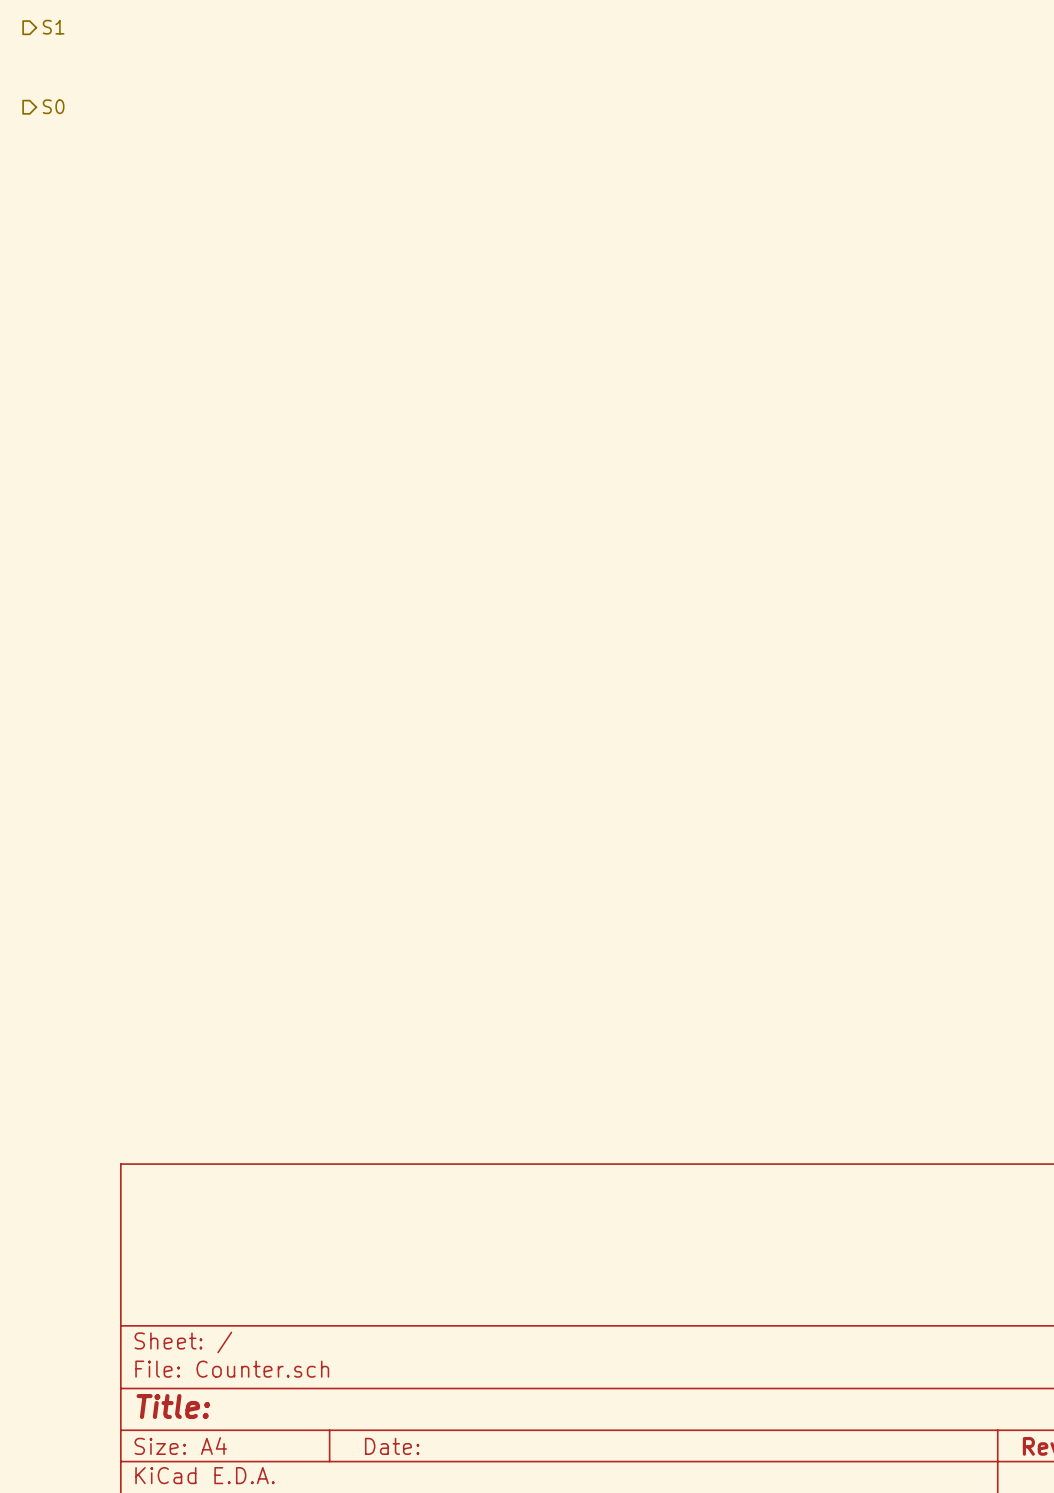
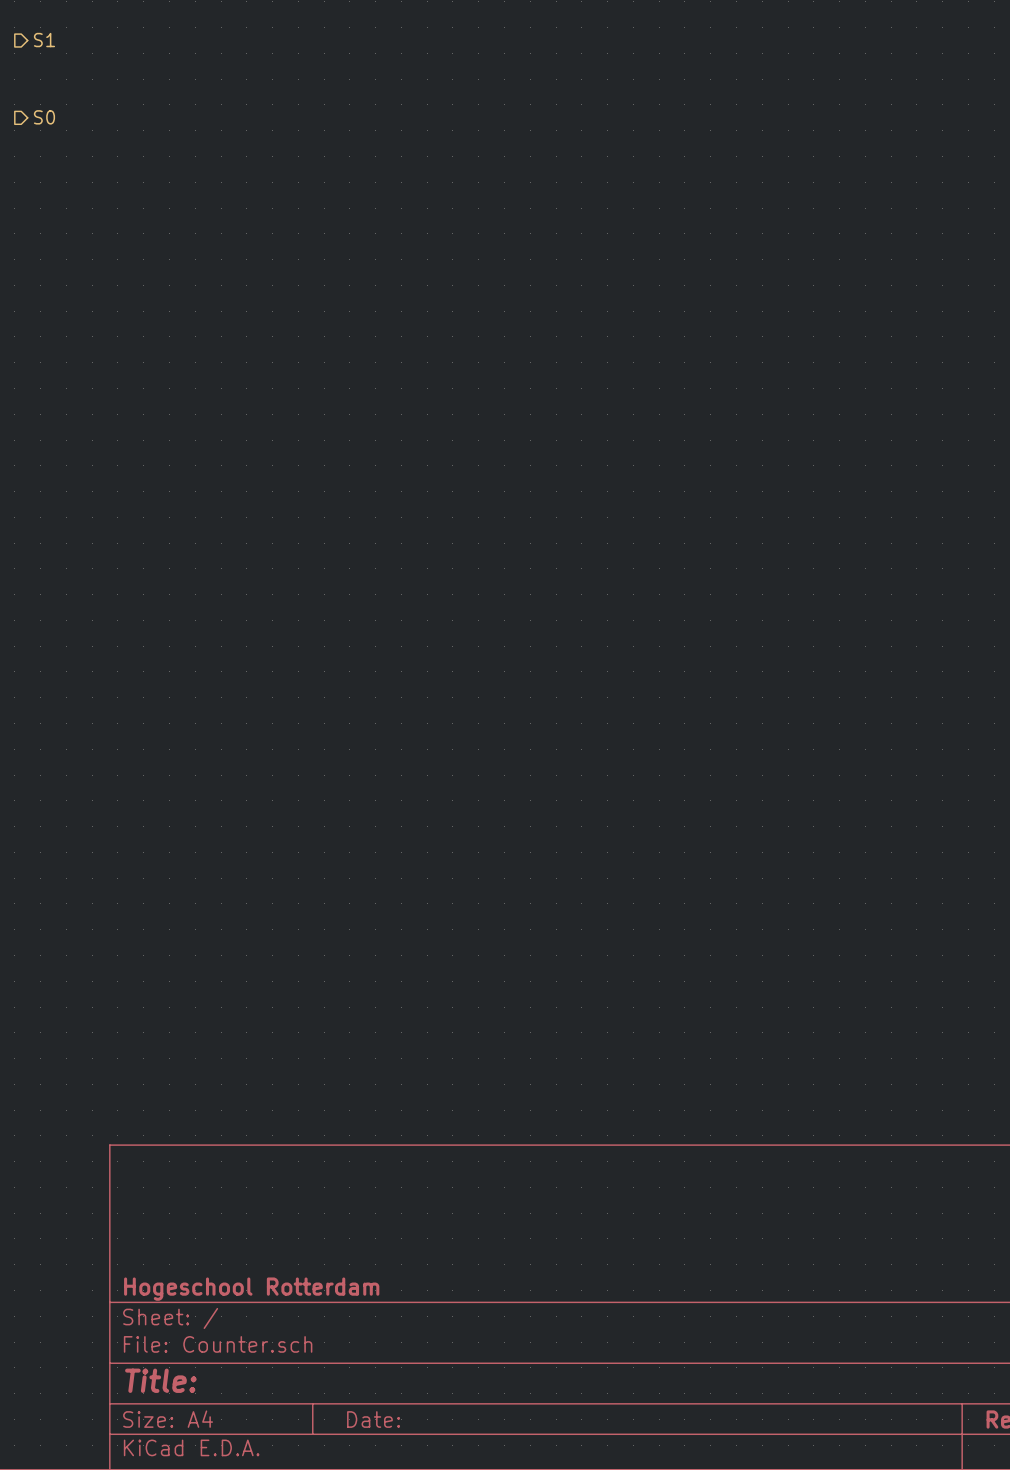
title block: none -> Hogeschool Rotterdam (251, 1289)

